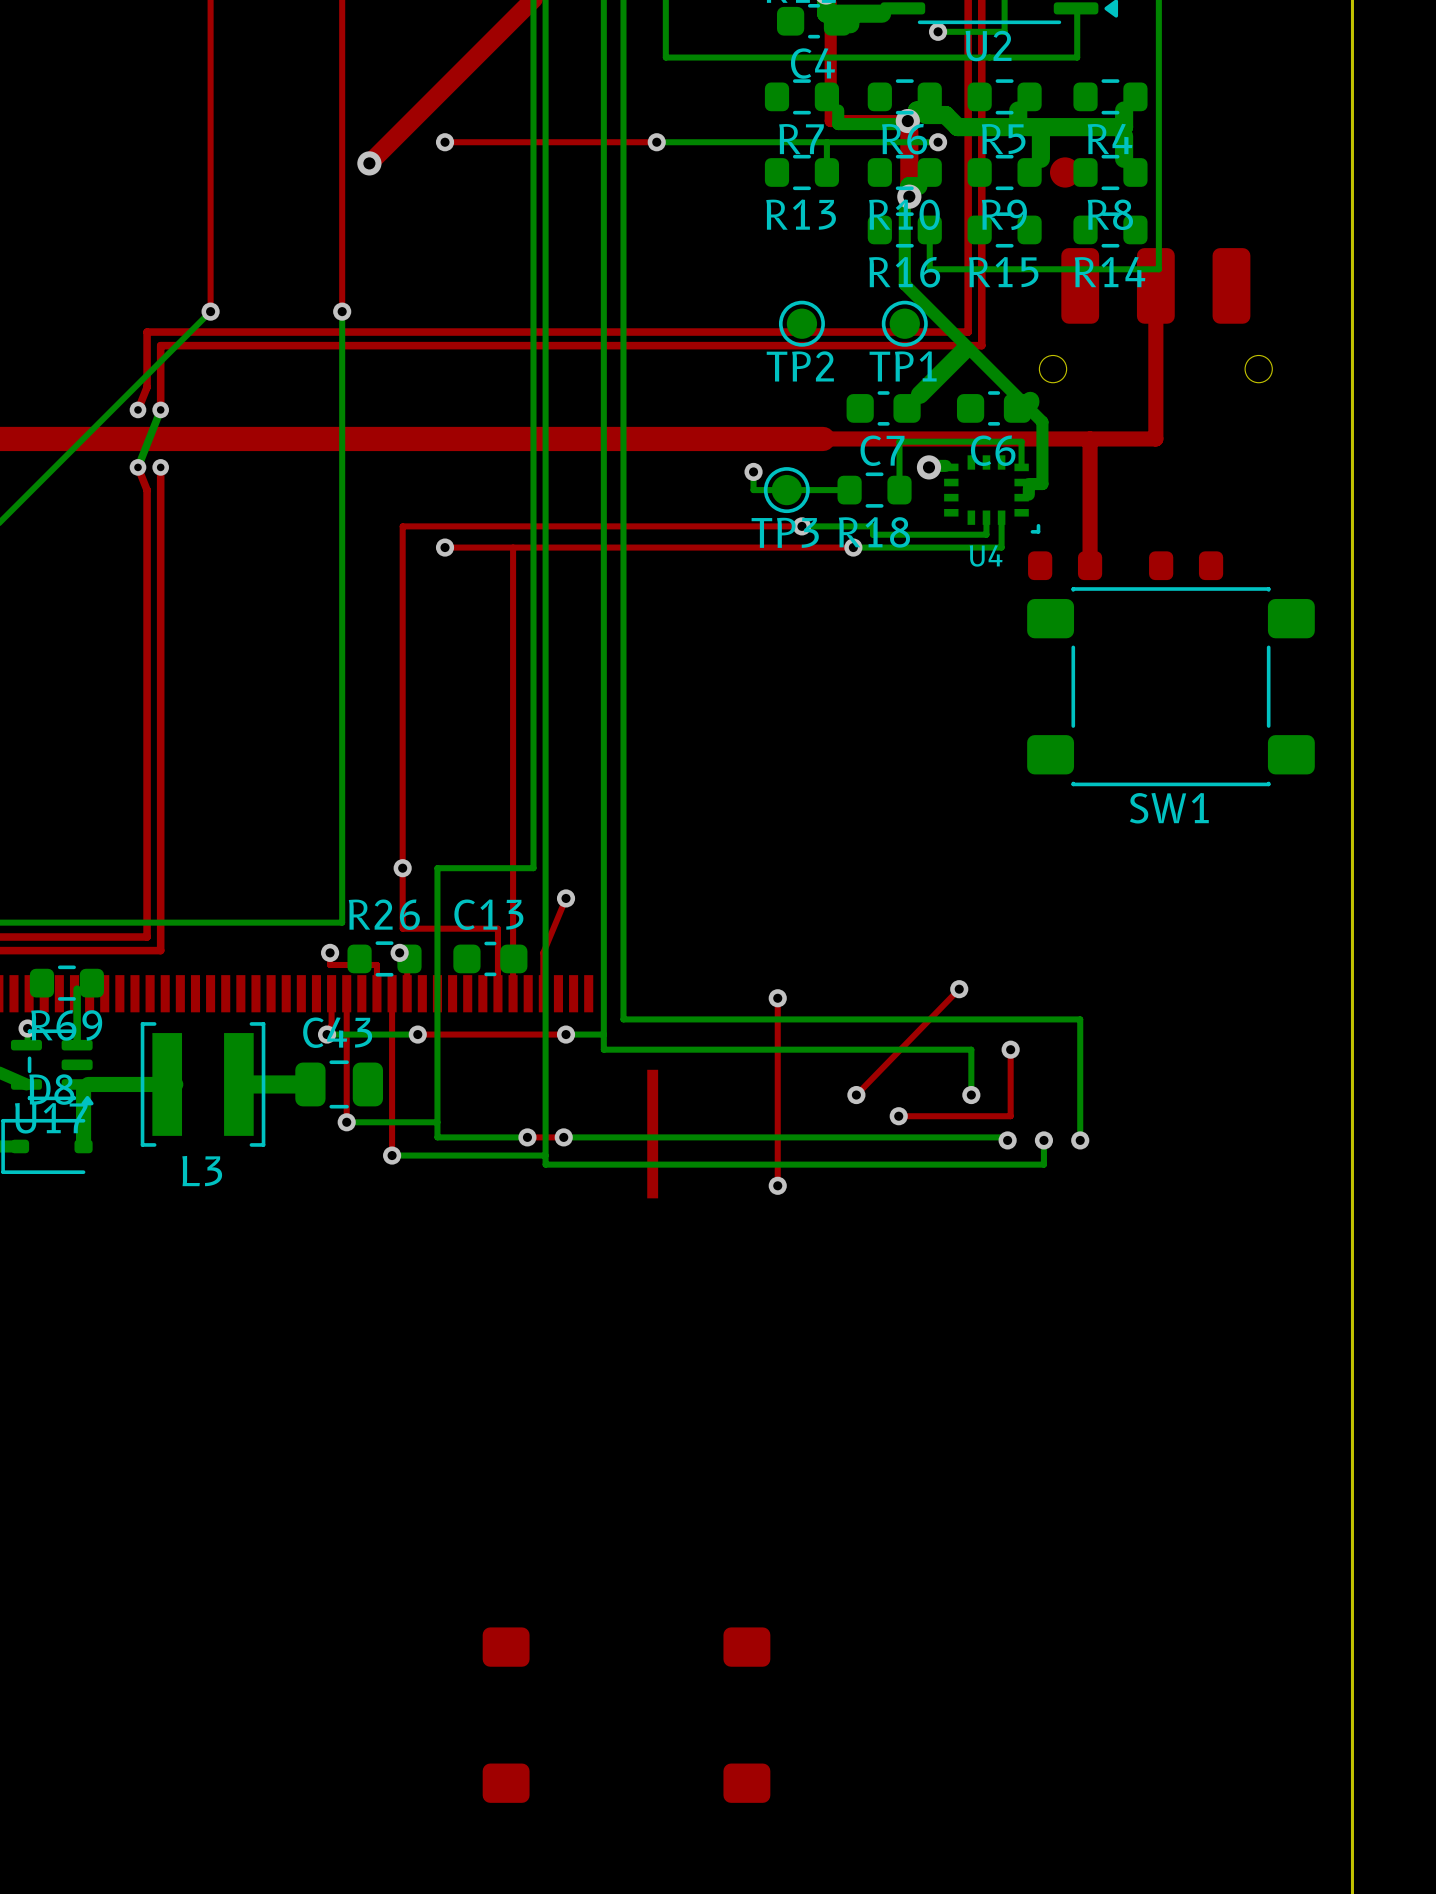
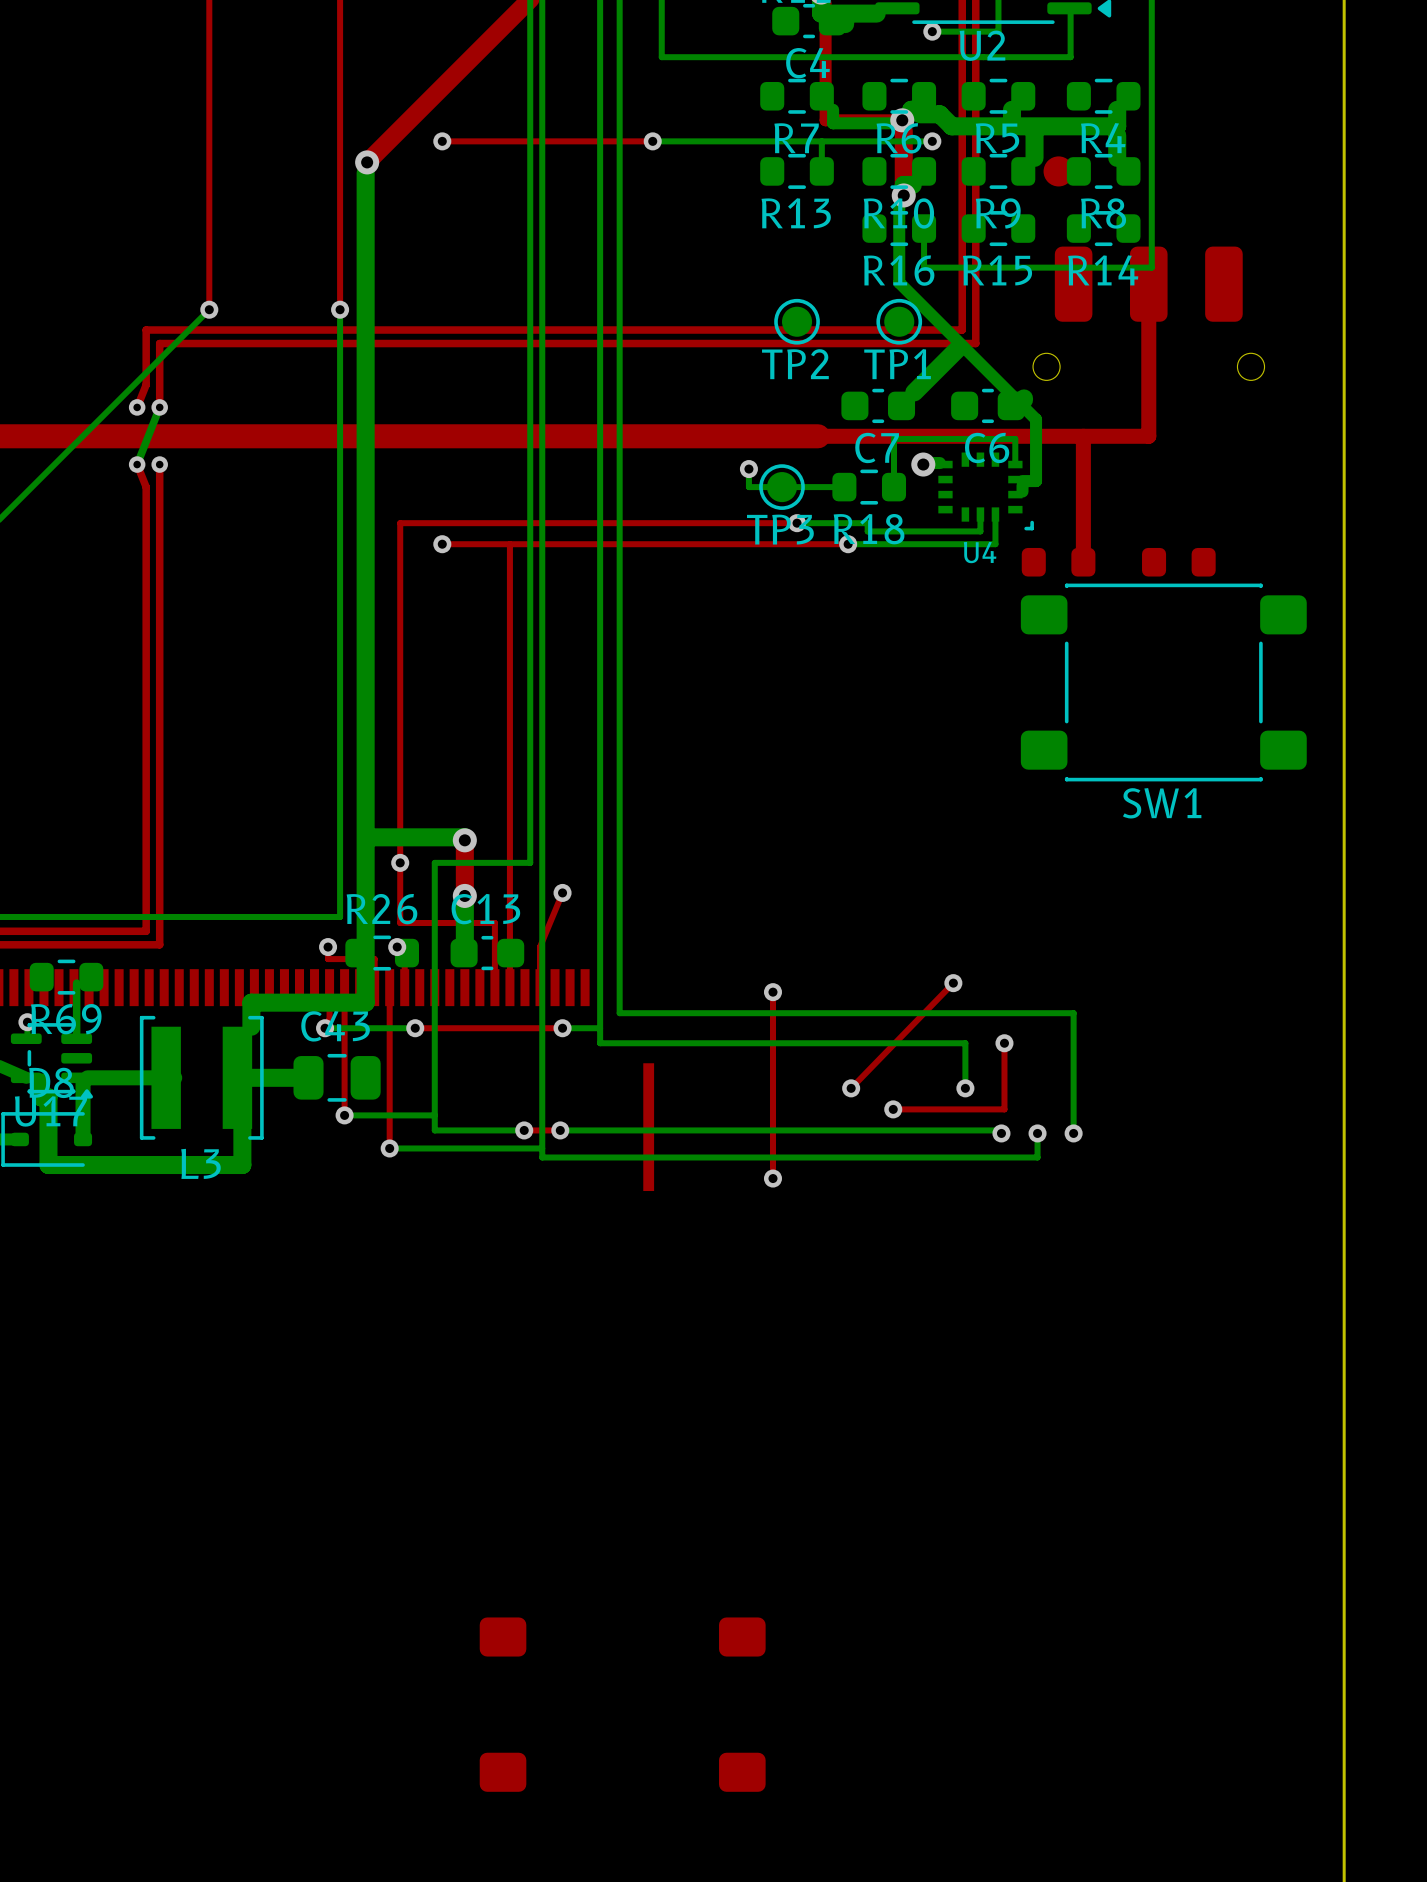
bottom track: none -> (365, 172) (365, 1002) (251, 1002) (251, 1026)
bottom track: none -> (374, 837) (464, 837) (464, 840)
top track: none -> (464, 840) (464, 895)
via: none -> (464, 840)
bottom track: none -> (464, 895) (464, 939)
via: none -> (464, 895)
bottom track: none -> (40, 1082) (40, 1097) (48, 1097) (48, 1165) (242, 1165) (242, 1085)

